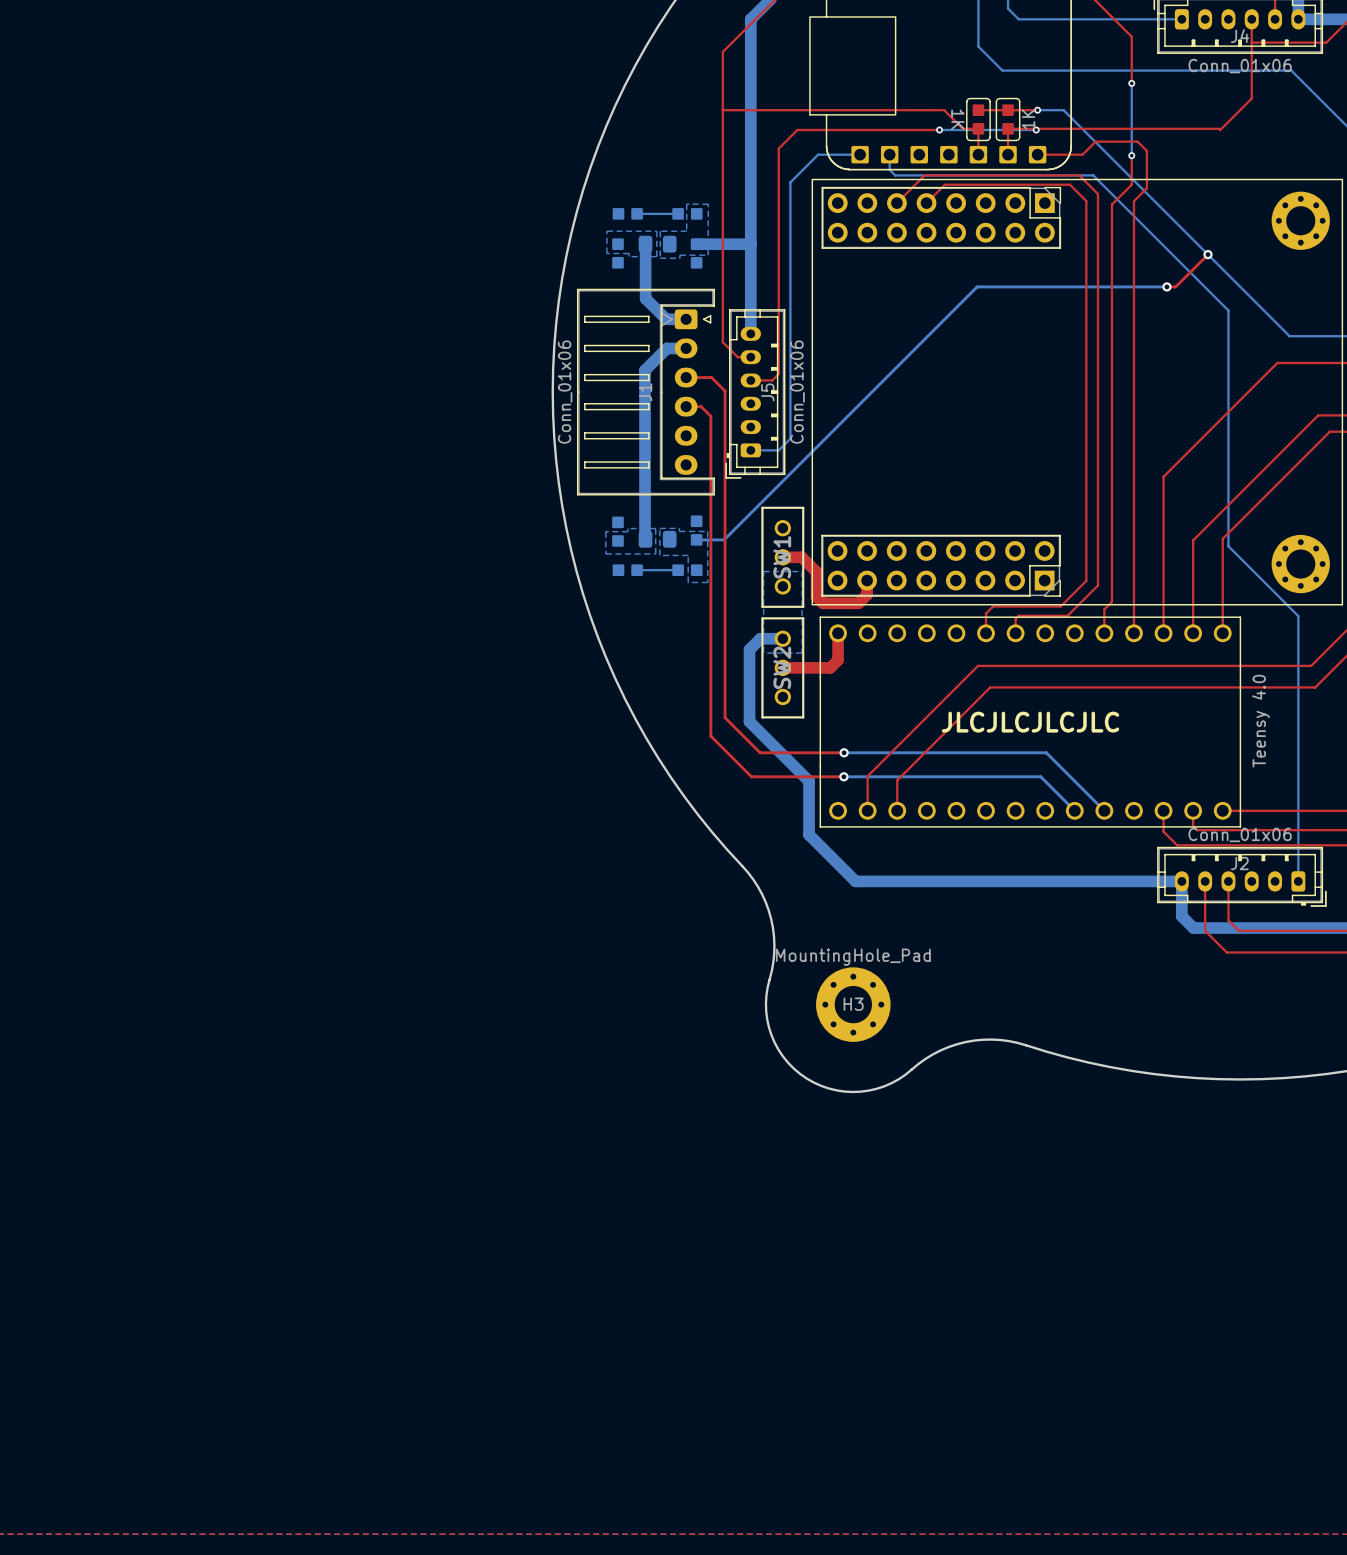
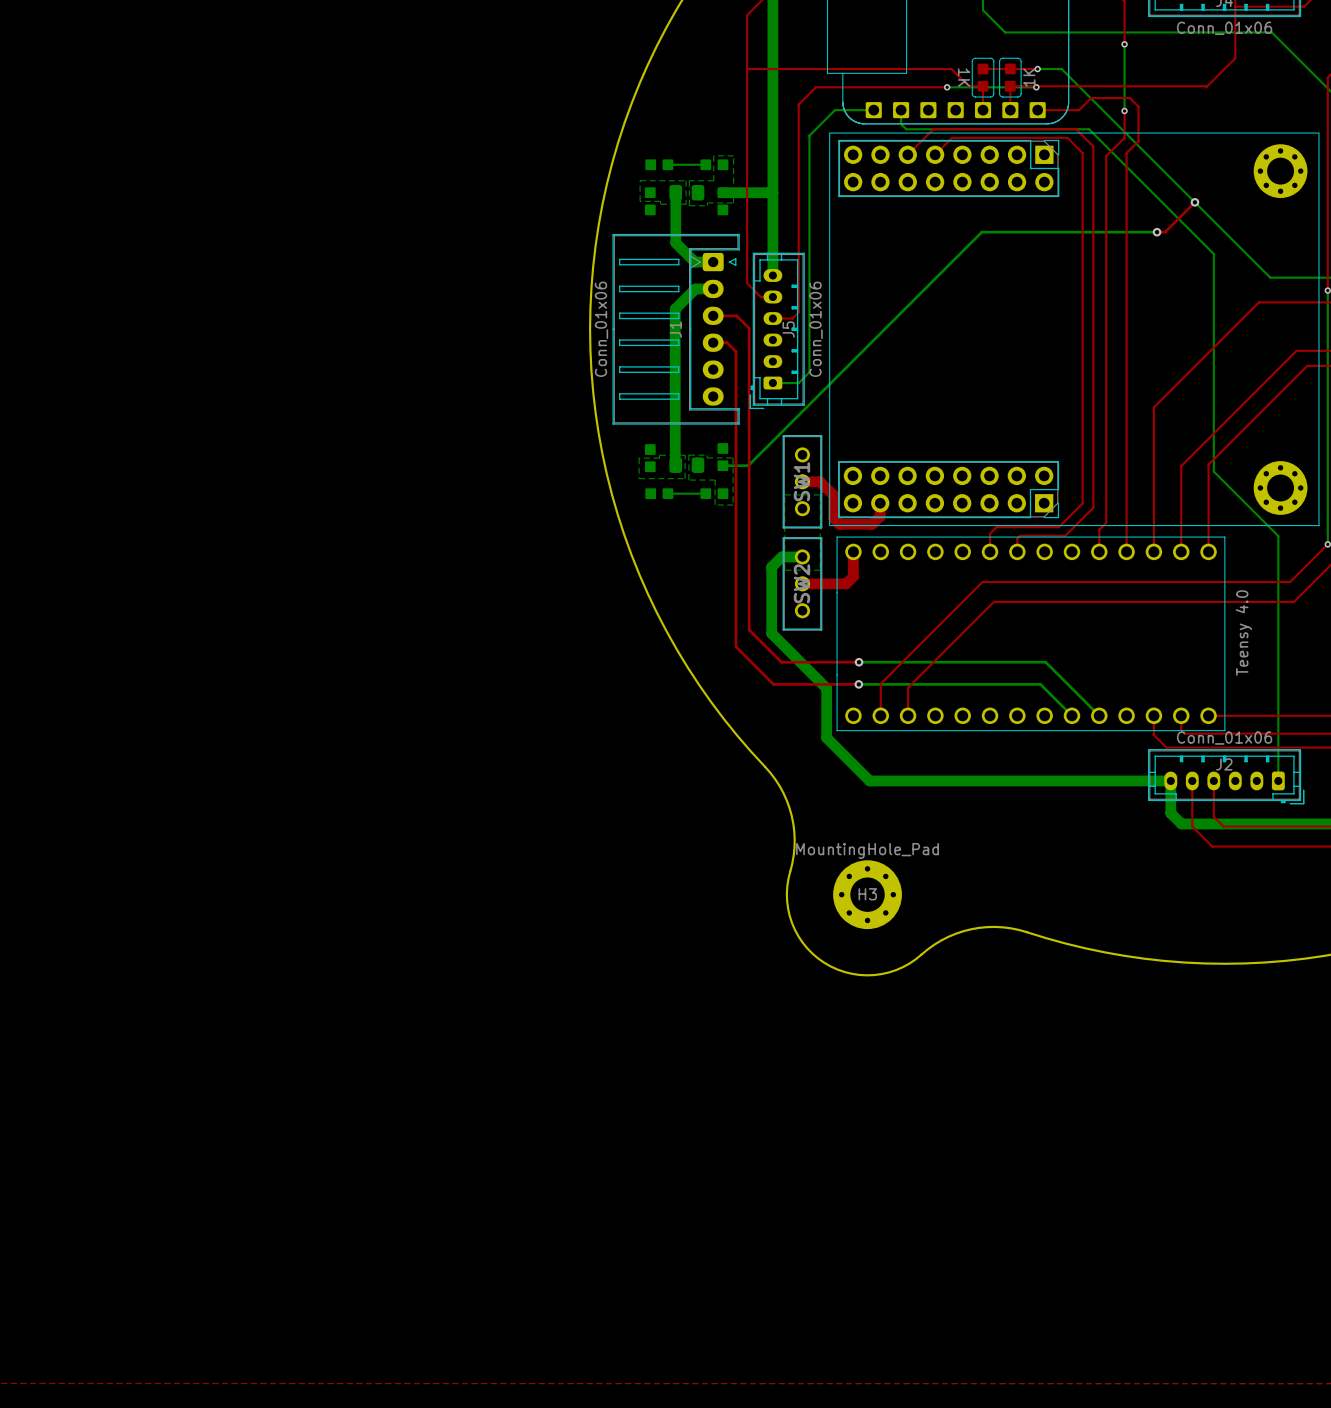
text: JLCJLCJLCJLC (1030, 722) -> none

